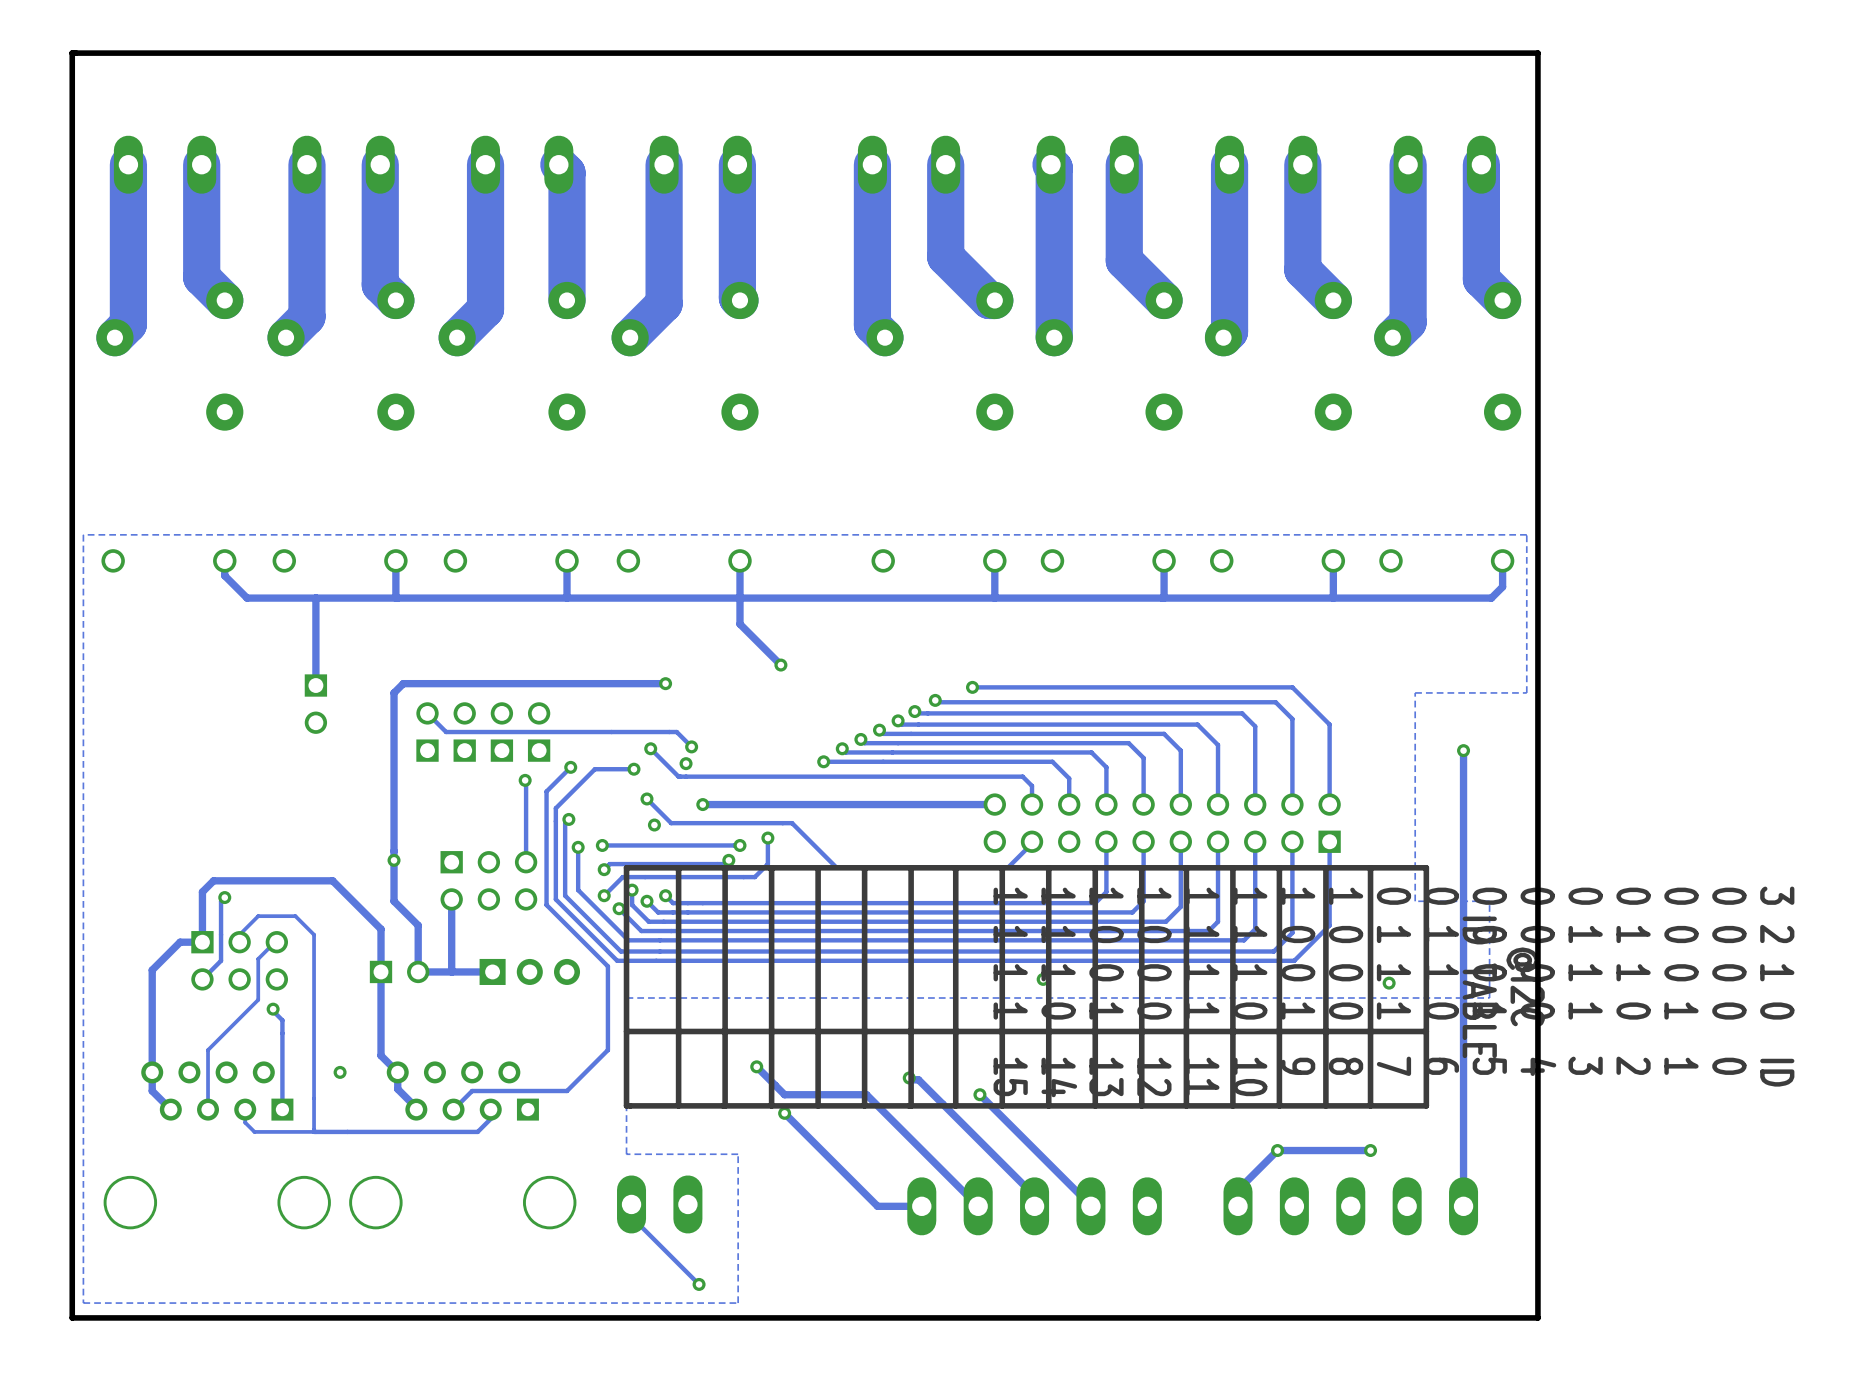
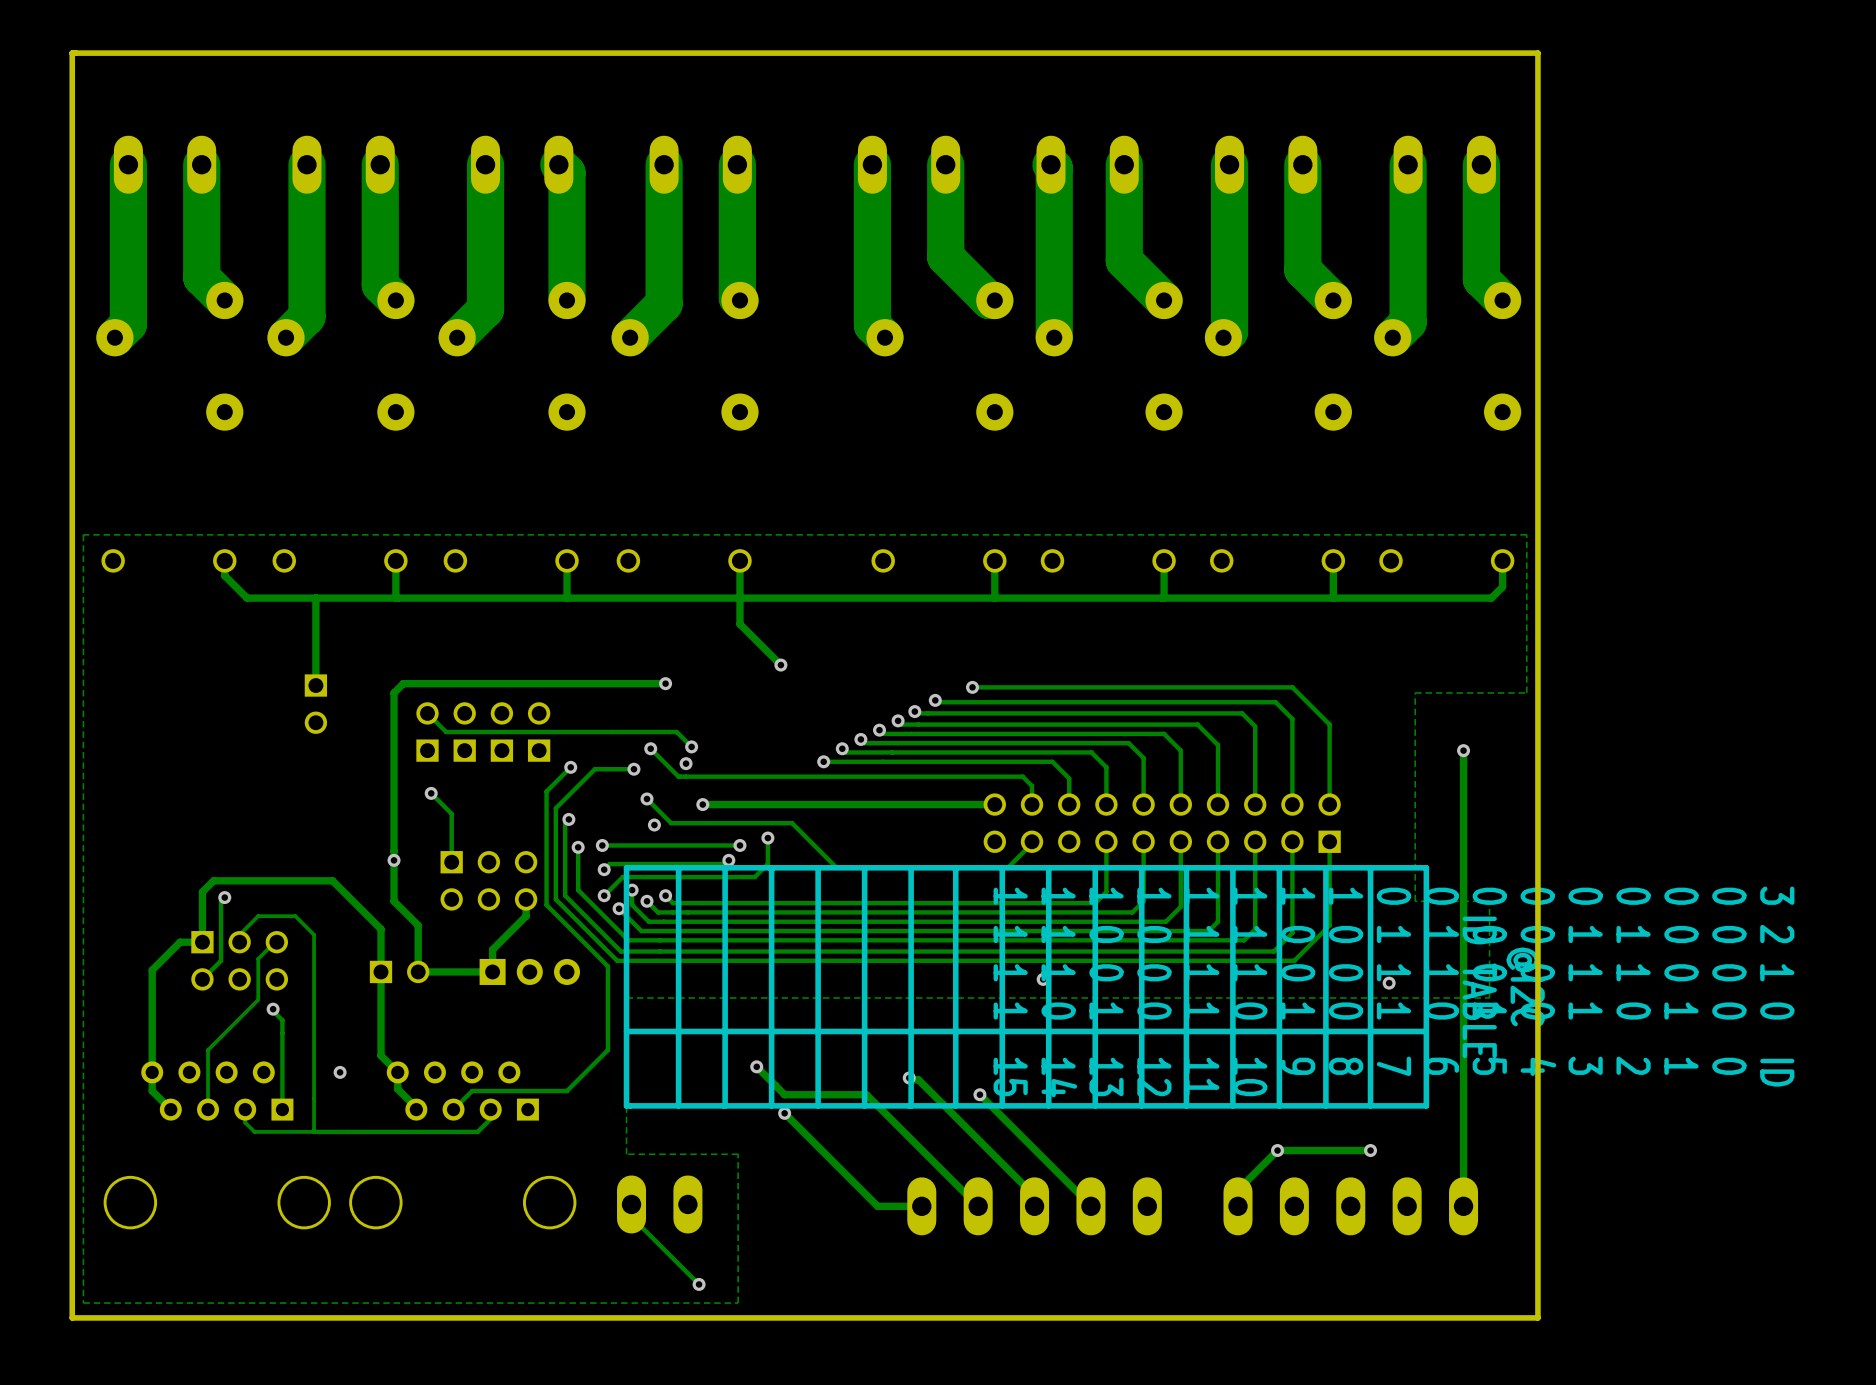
track: (525, 780) (526, 862) -> none
via: (525, 780) -> none
track: none -> (431, 793) (451, 813) (451, 862)
via: none -> (431, 793)
track: (451, 899) (451, 971) -> none
track: none -> (526, 899) (526, 916) (492, 949) (492, 971)

